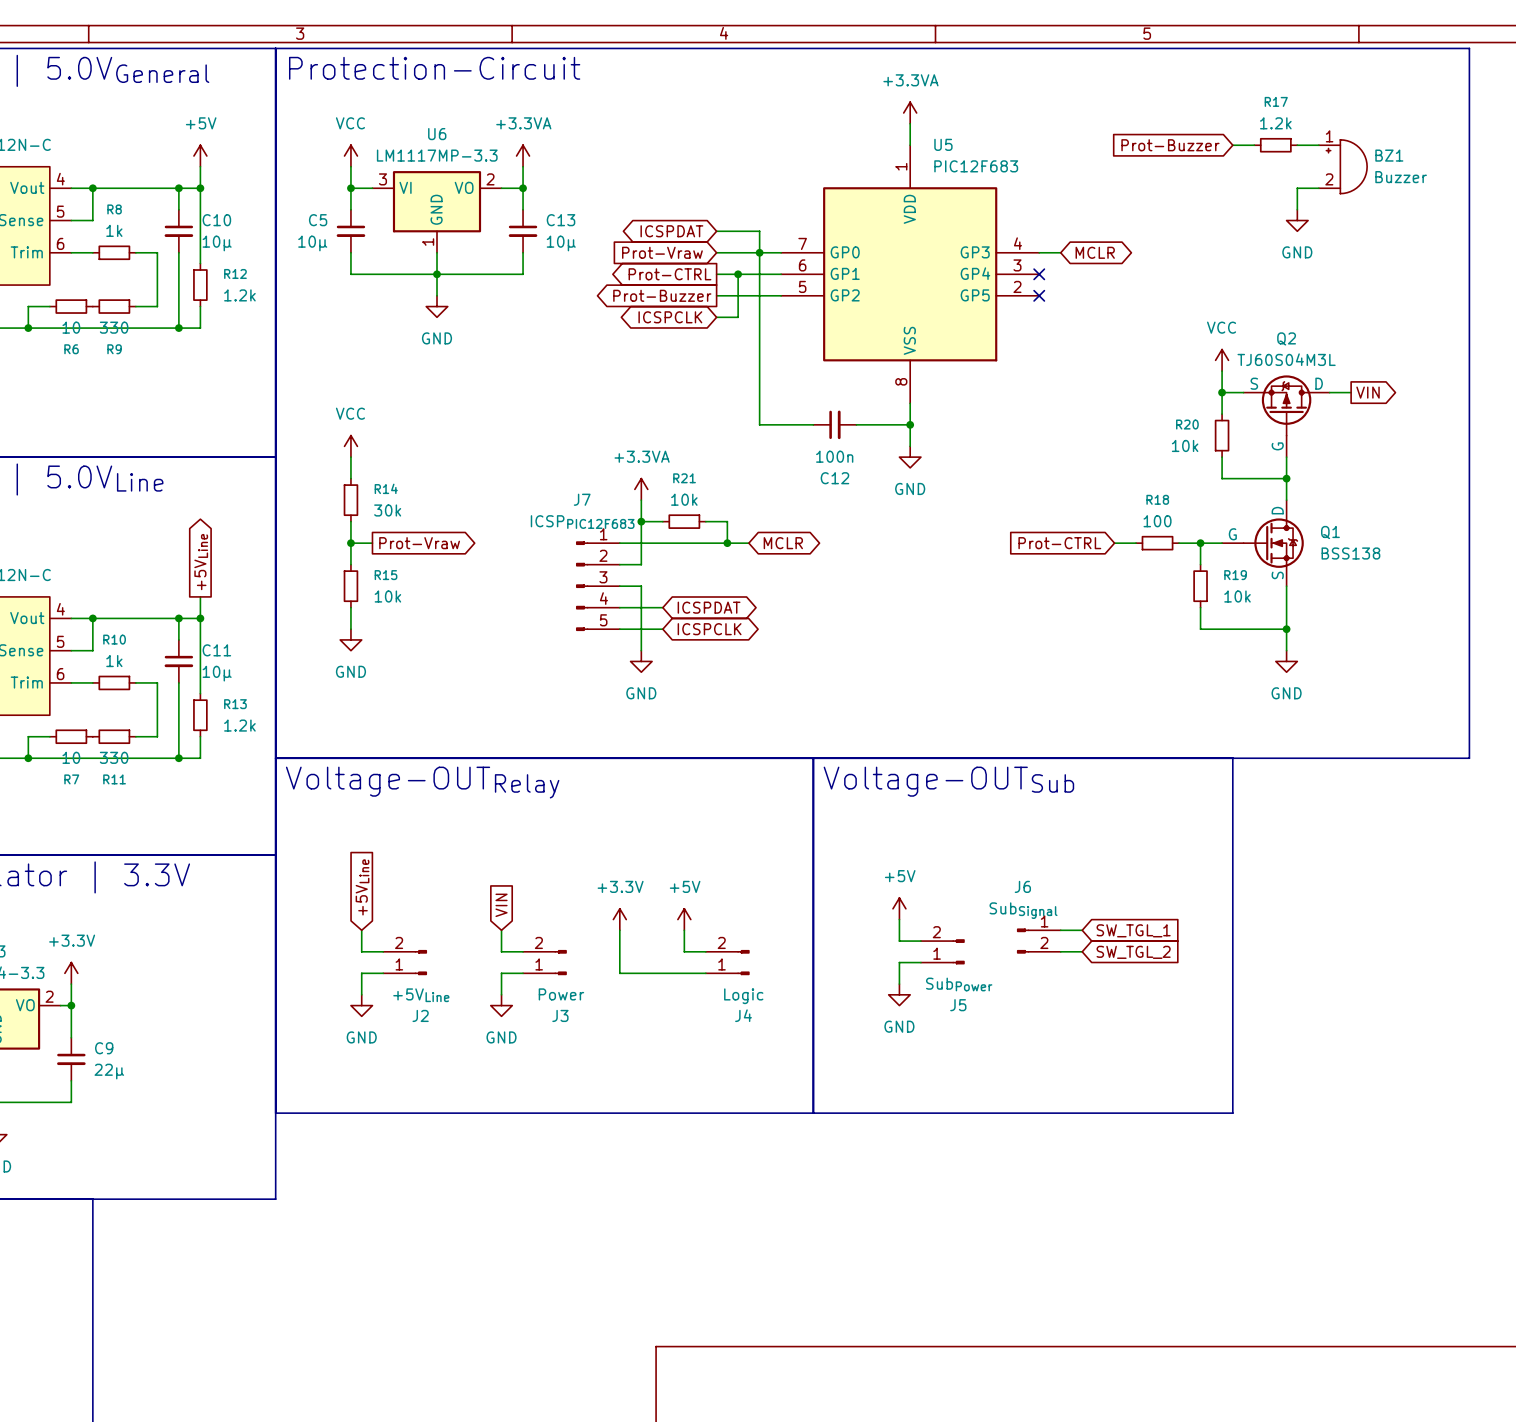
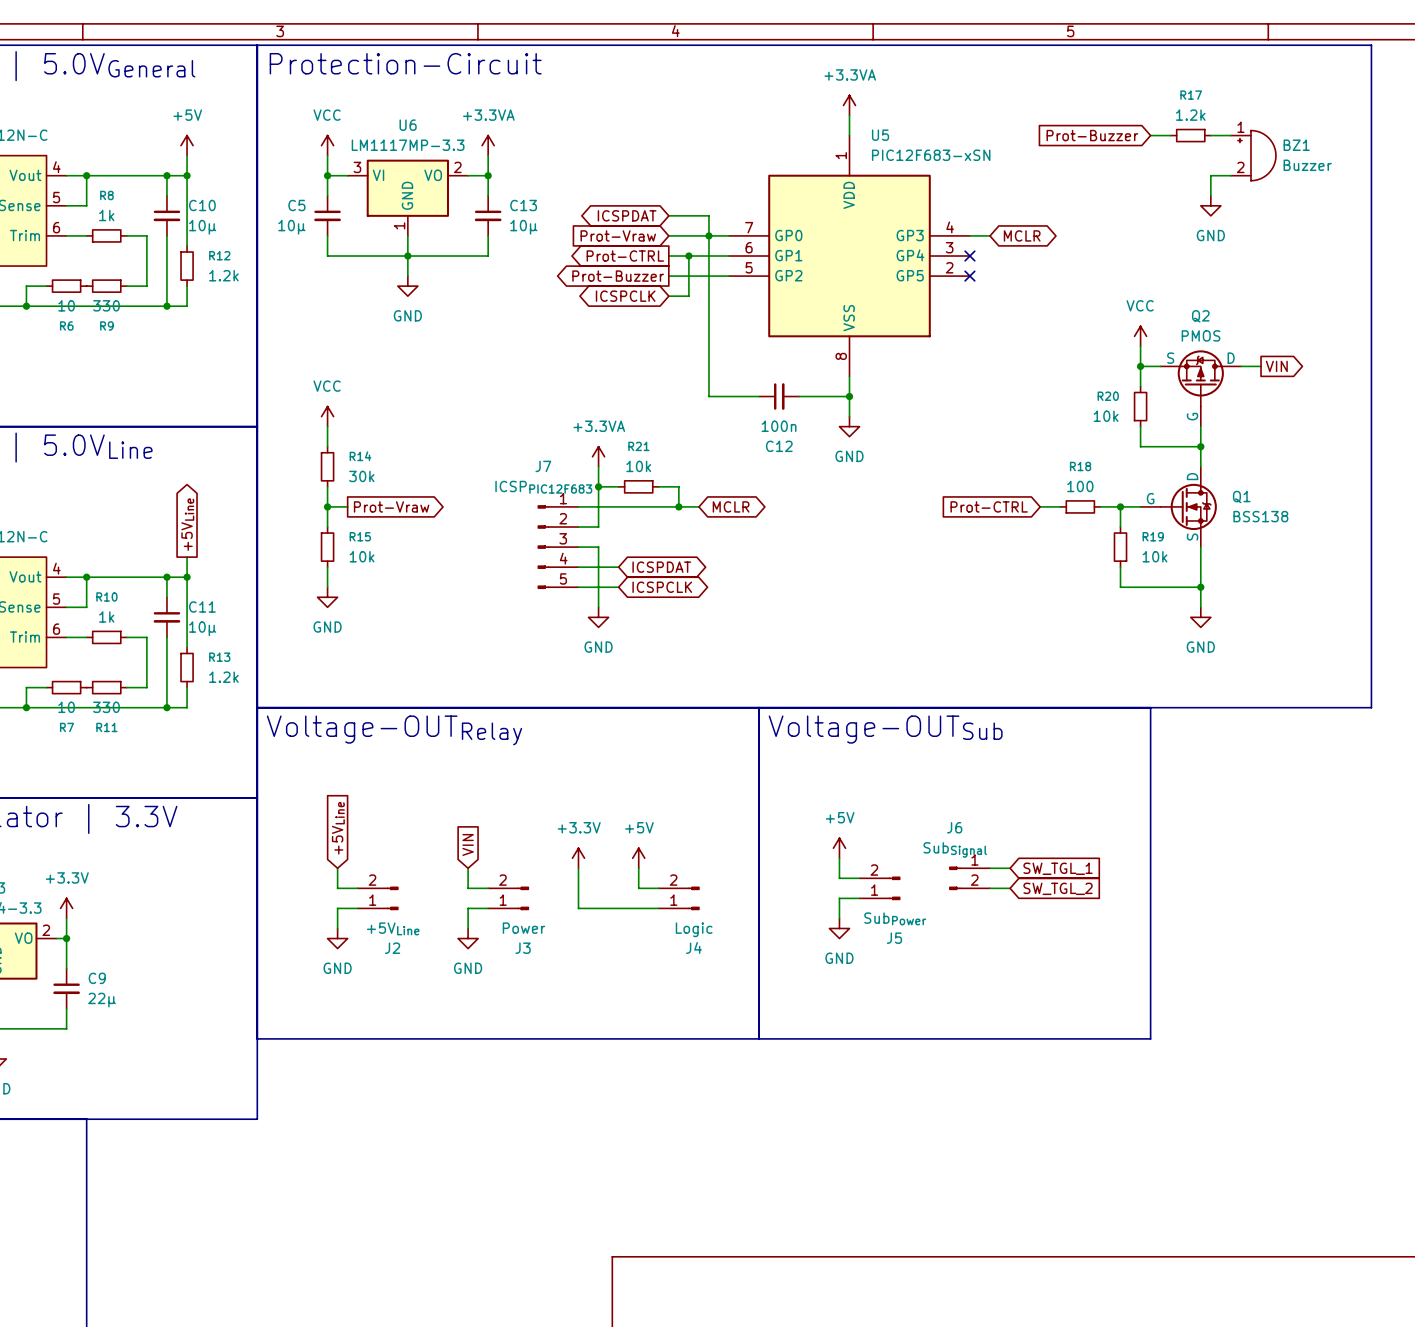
U5 value: PIC12F683 (976, 166) -> PIC12F683-xSN (931, 155)
Q2 value: TJ60S04M3L (1286, 359) -> PMOS (1201, 335)

